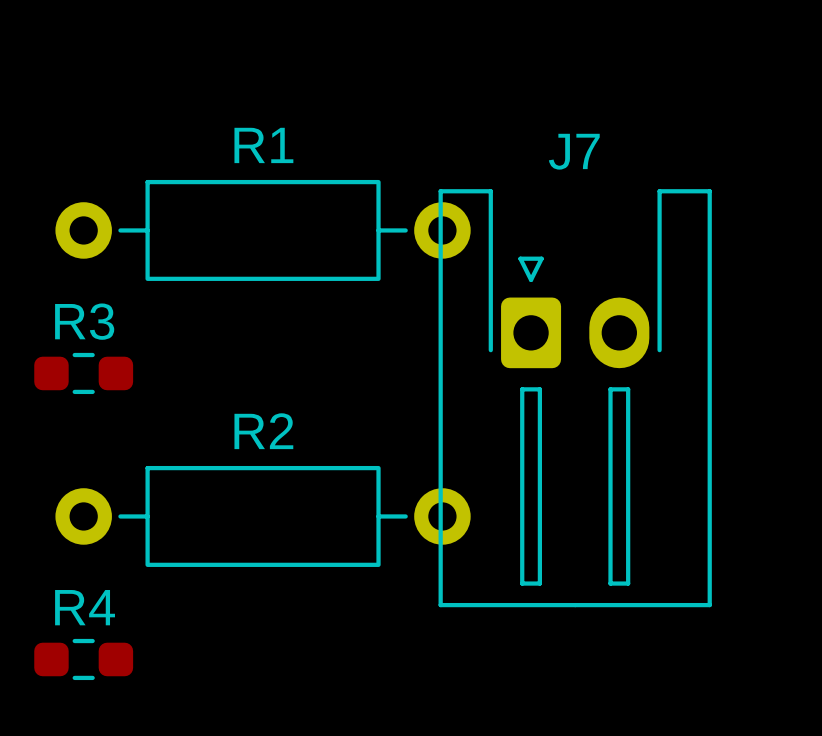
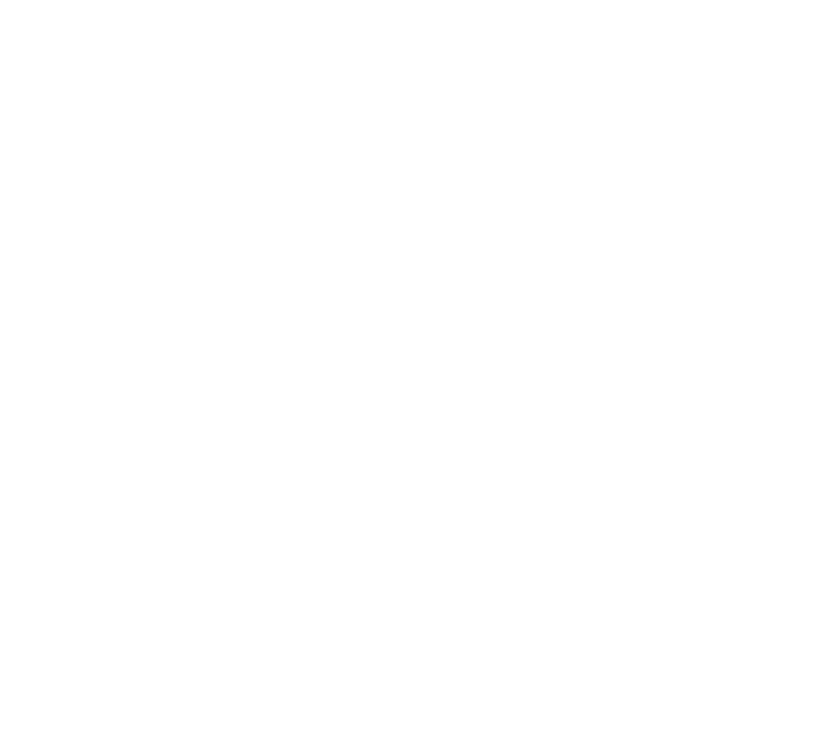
R1: (263, 230) -> none
R3: (83, 373) -> none
J7: (575, 398) -> none
R2: (263, 516) -> none
R4: (83, 659) -> none

